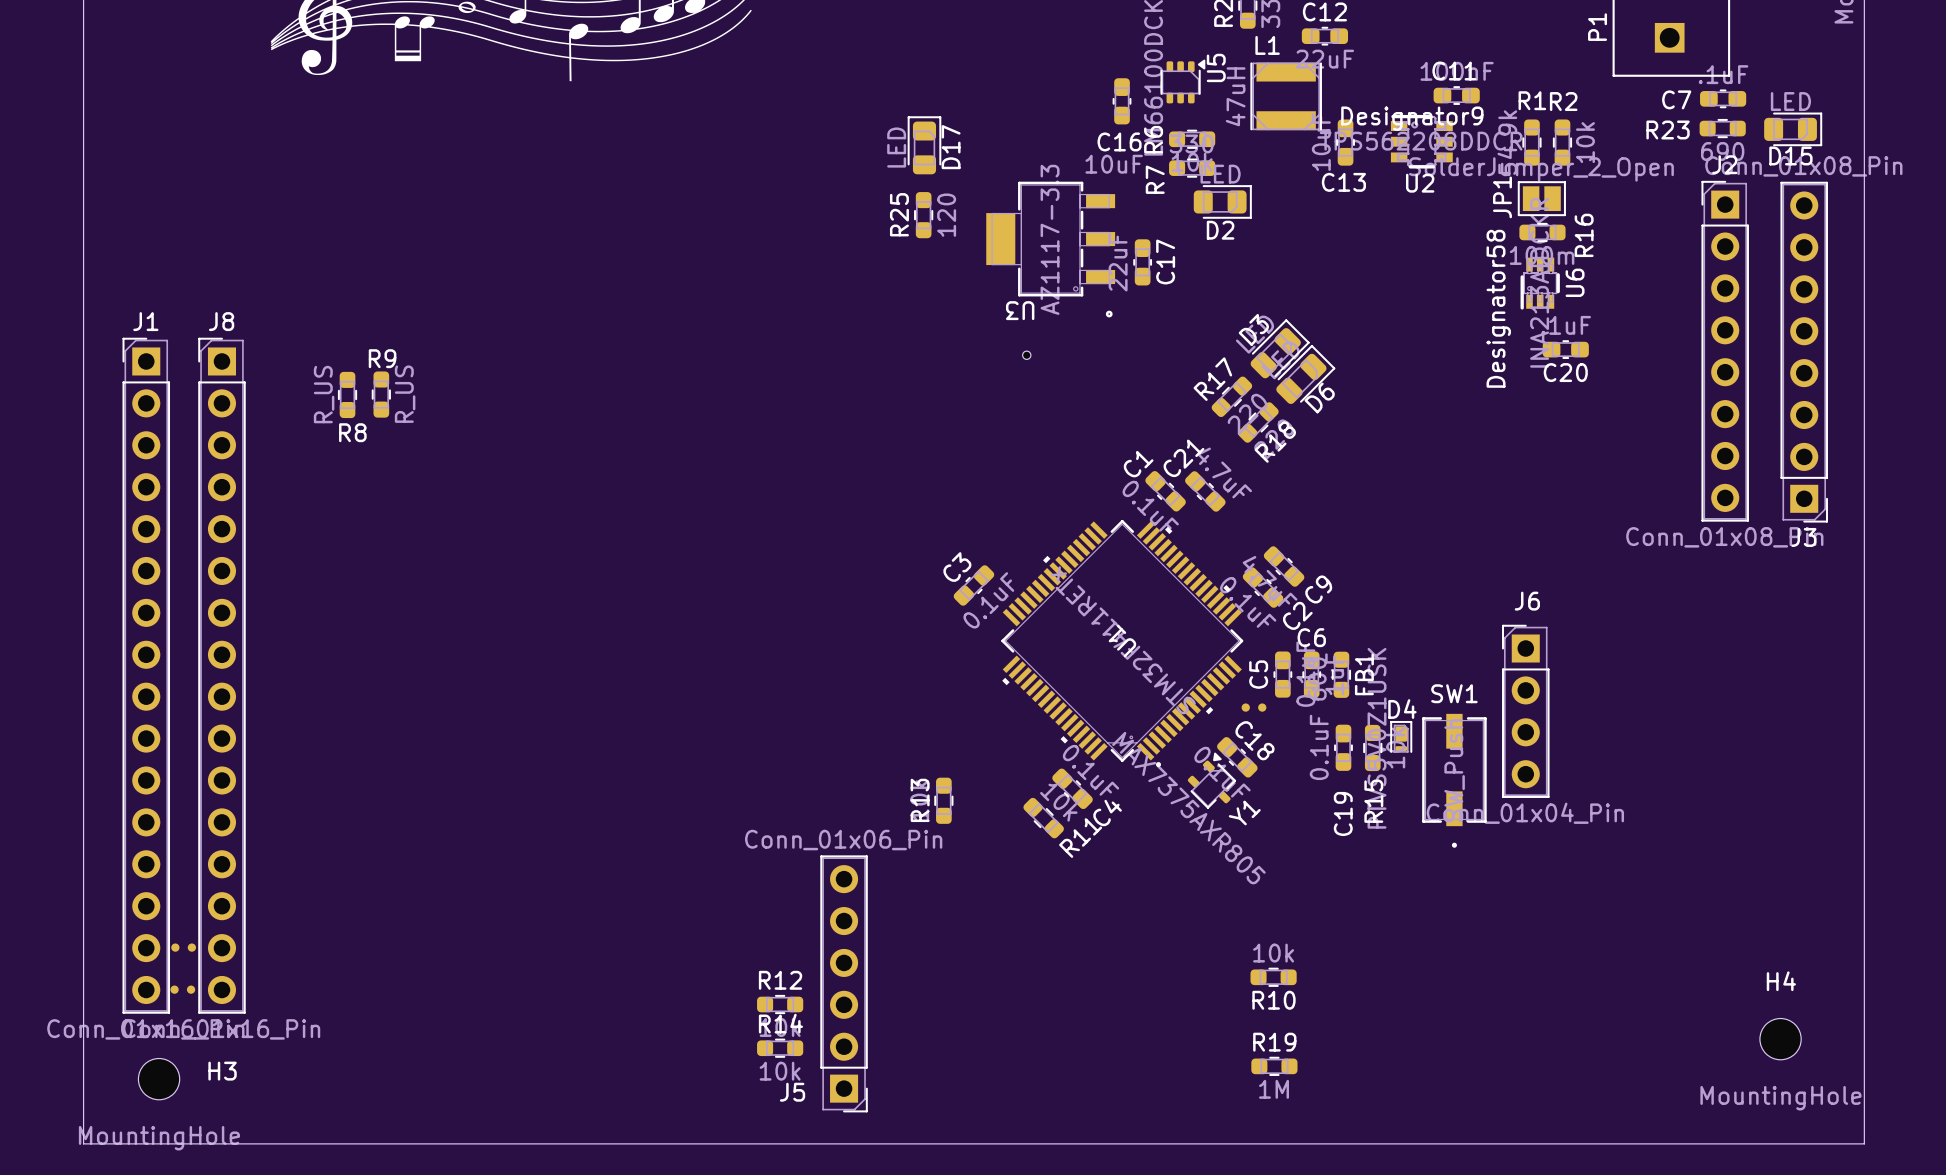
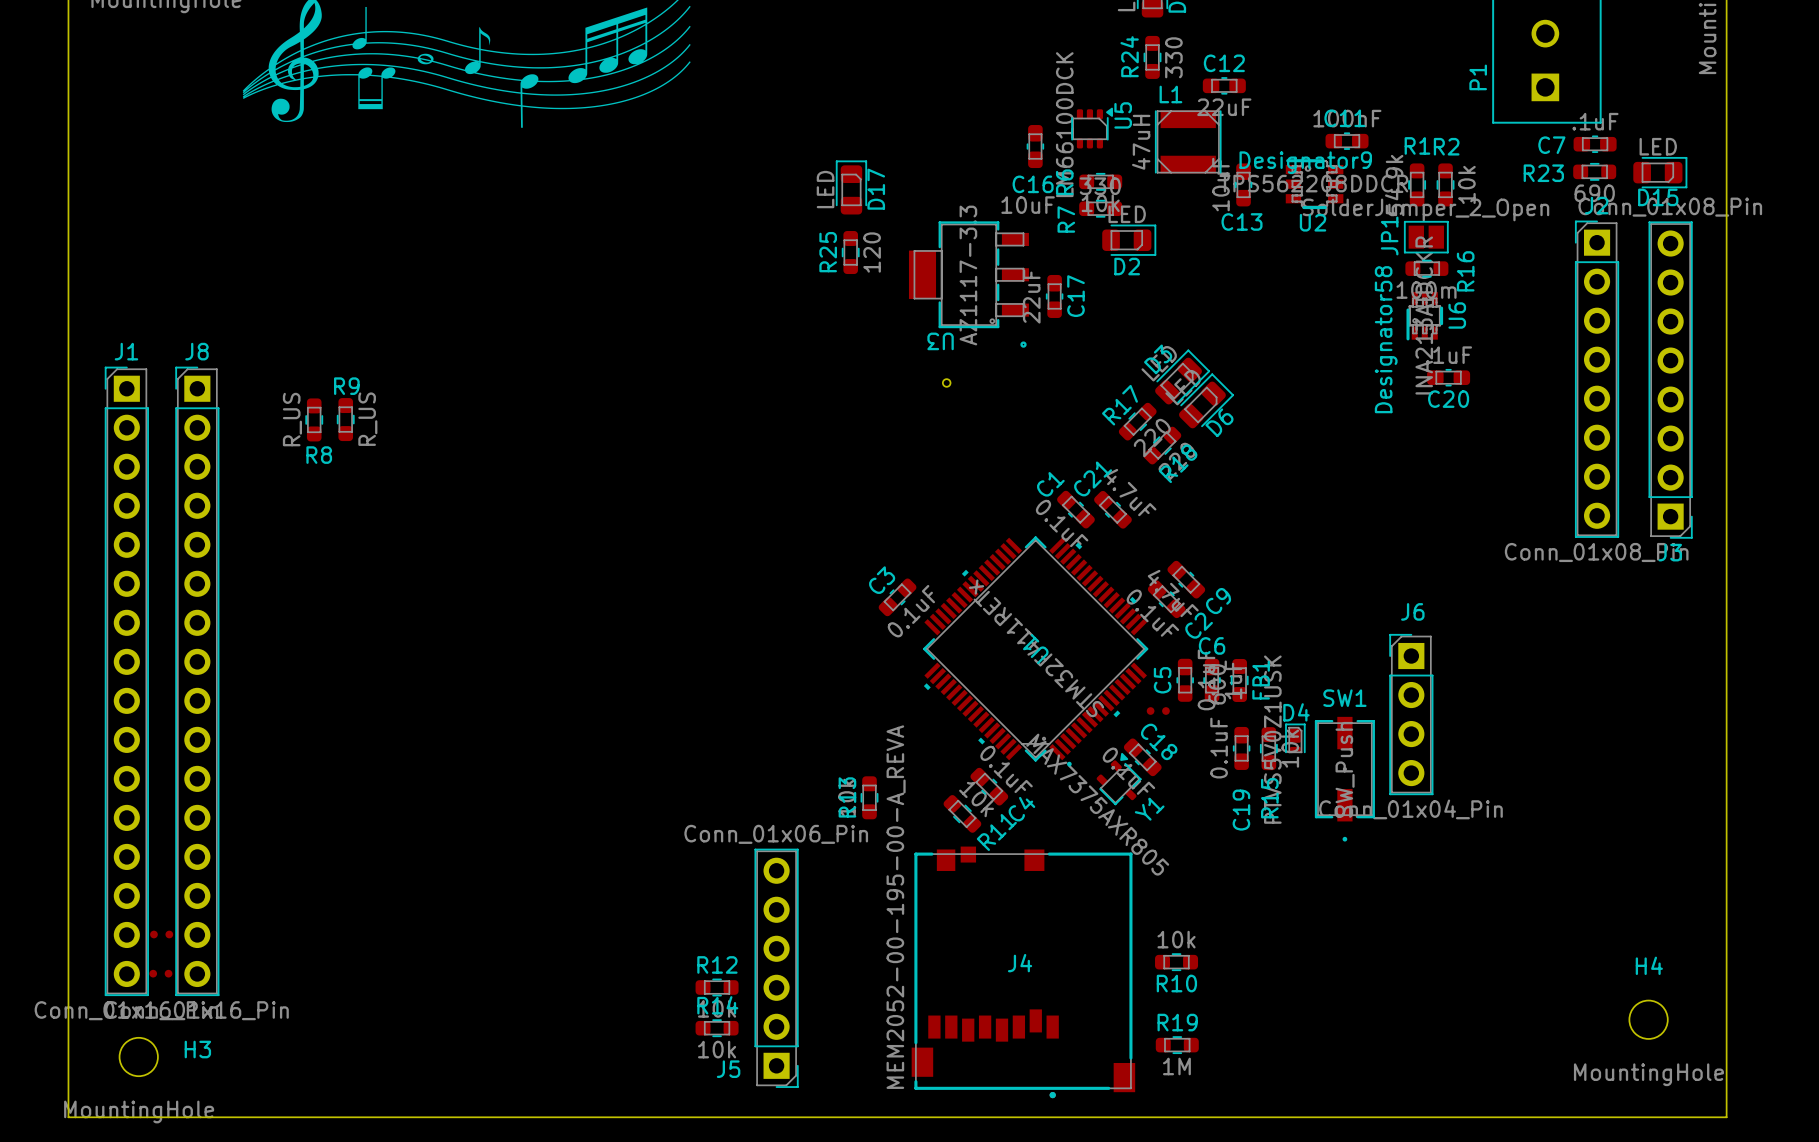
J4: none -> MEM2052-00-195-00-A_REVA (1023, 972)

